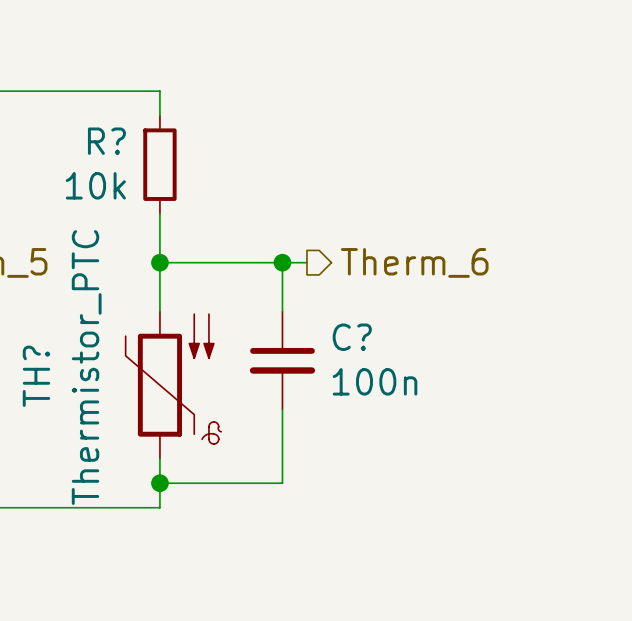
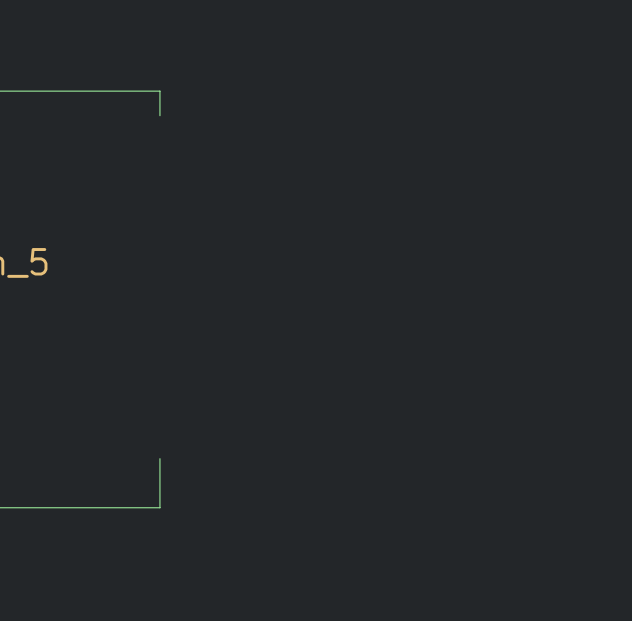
R?: 10k (159, 164) -> none
wire: (159, 213) (159, 311) -> none
wire: (159, 262) (306, 262) -> none
junction: (159, 262) -> none
wire: (282, 262) (282, 311) -> none
junction: (282, 262) -> none
hierarchical label: Therm_6 (414, 262) -> none
C?: 100n (282, 360) -> none
TH?: Thermistor_PTC (173, 385) -> none
wire: (282, 409) (282, 483) (159, 483) -> none
junction: (159, 483) -> none

